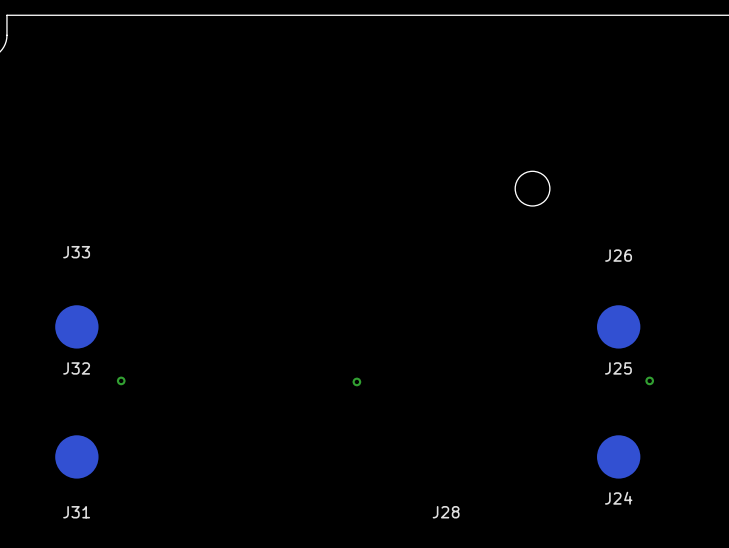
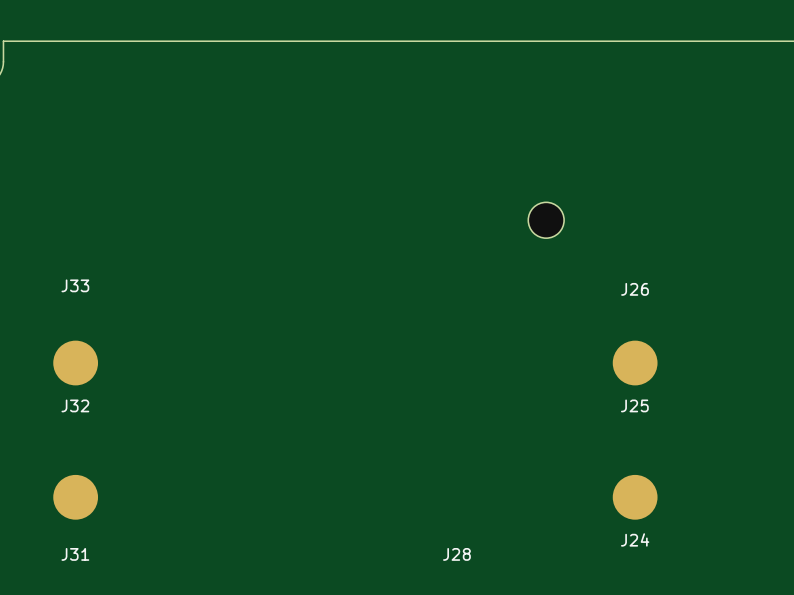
via: (121, 380) -> none
via: (649, 380) -> none
via: (356, 381) -> none

